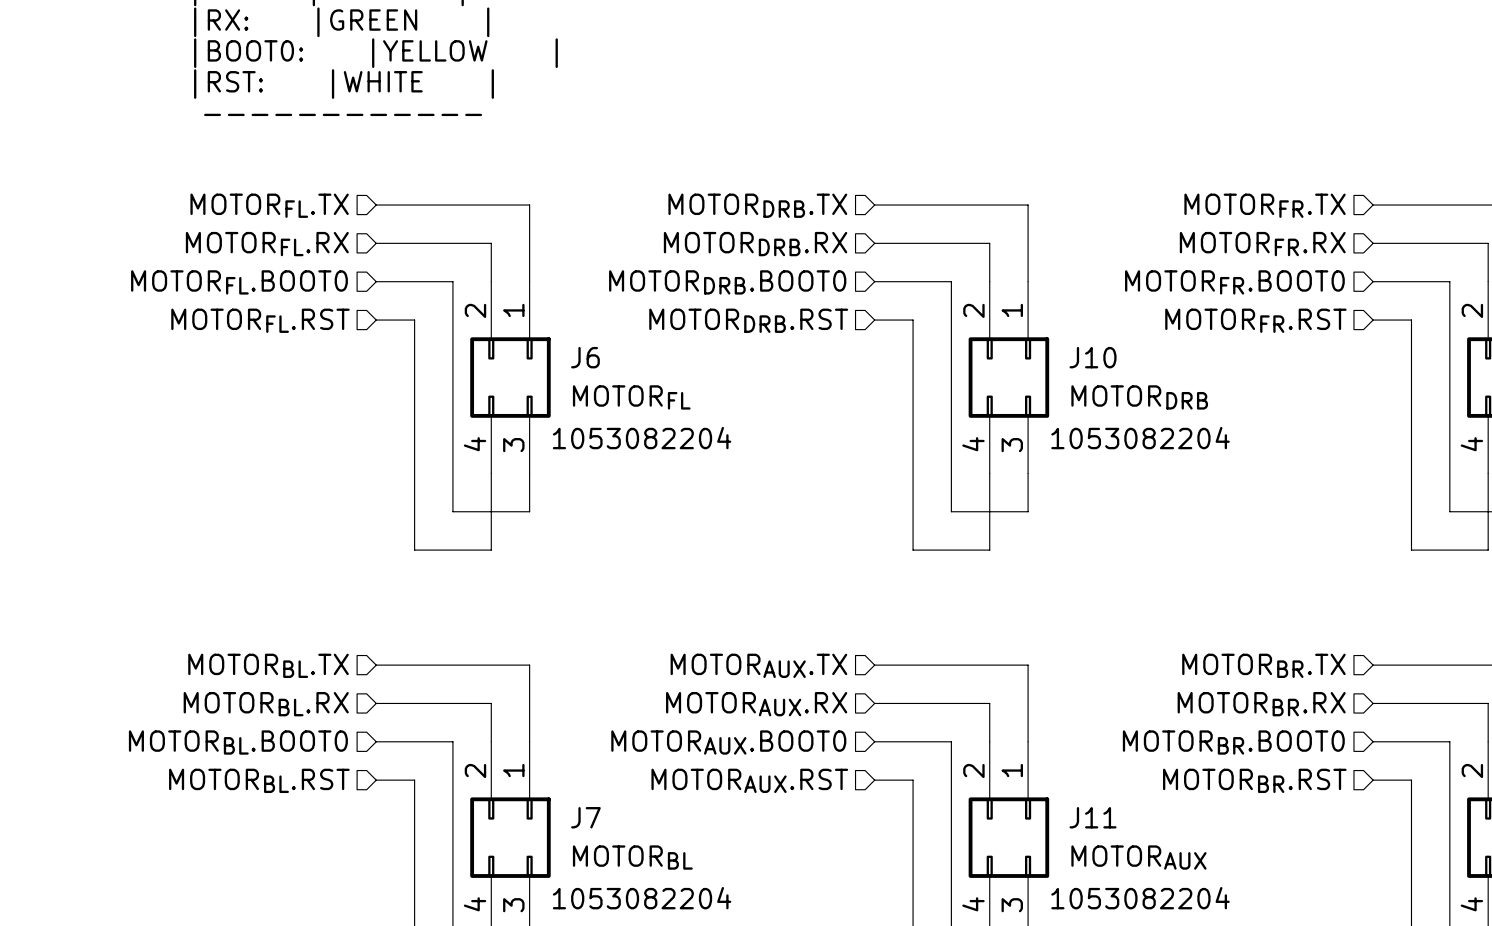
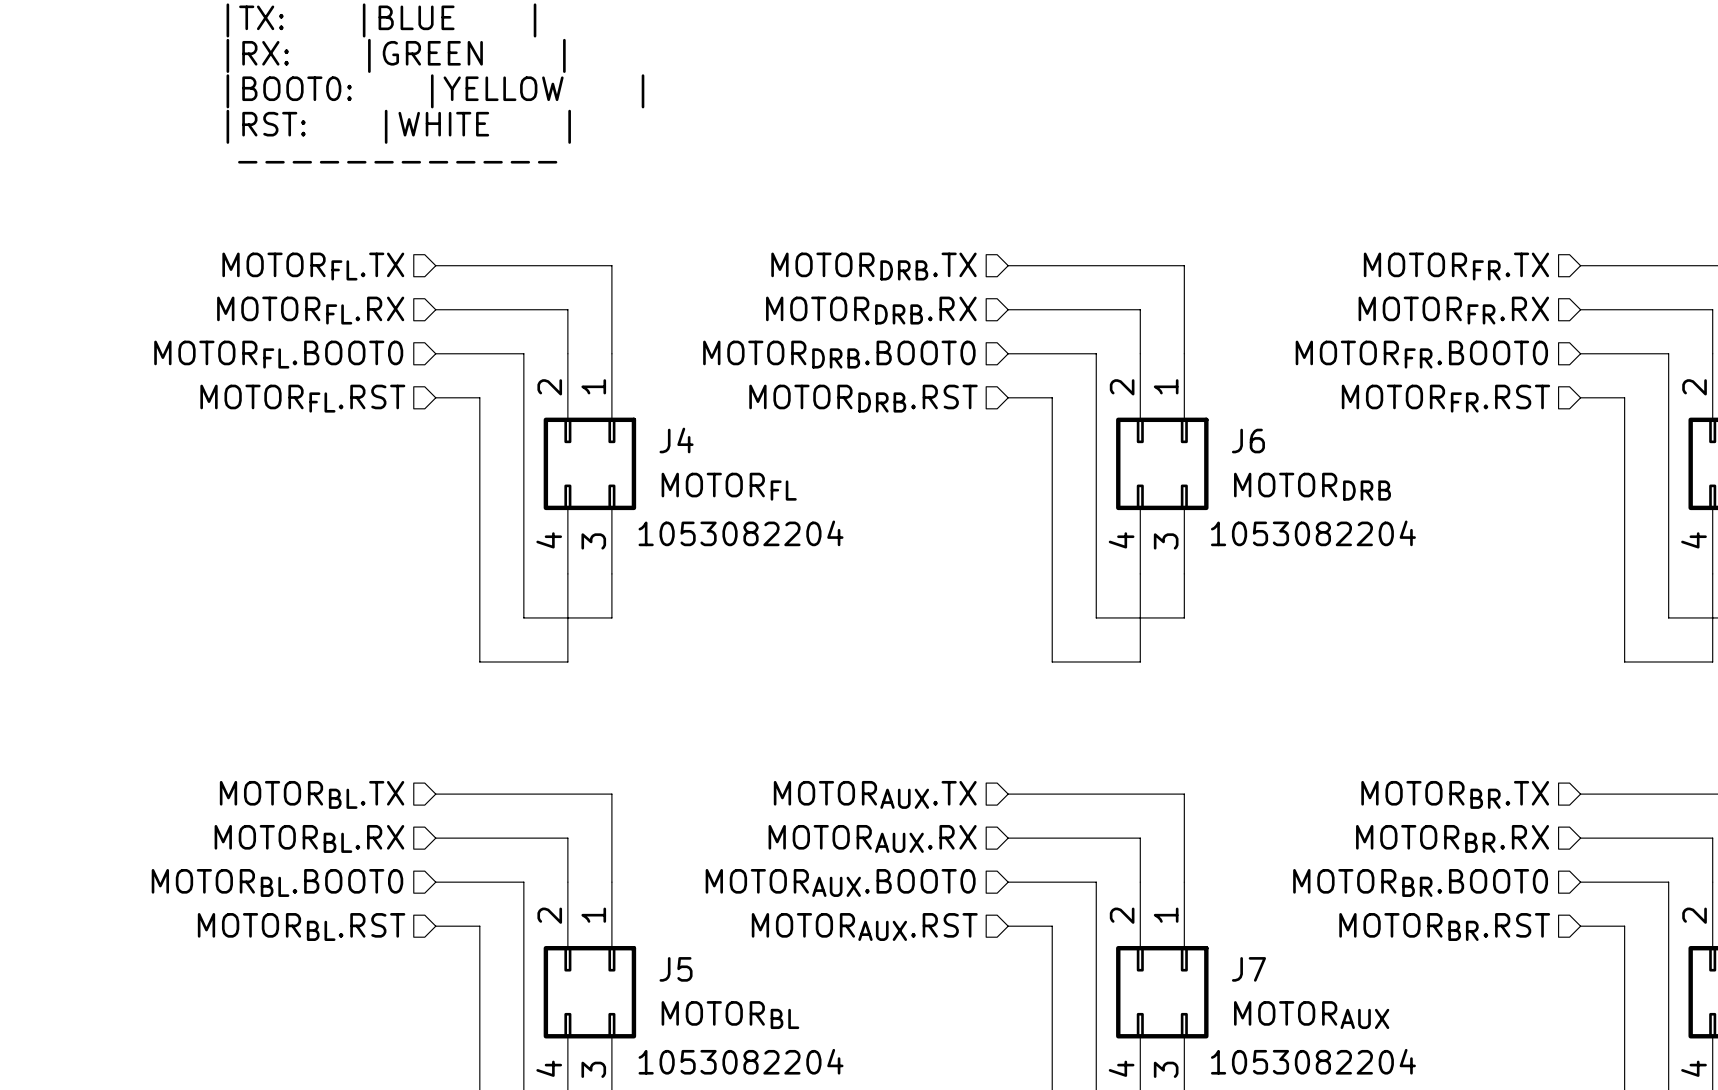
J6 name: J6 (585, 357) -> J4 (676, 440)
J10 name: J10 (1093, 357) -> J6 (1248, 441)
J7 name: J7 (585, 817) -> J5 (676, 969)
J11 name: J11 (1093, 817) -> J7 (1248, 969)

